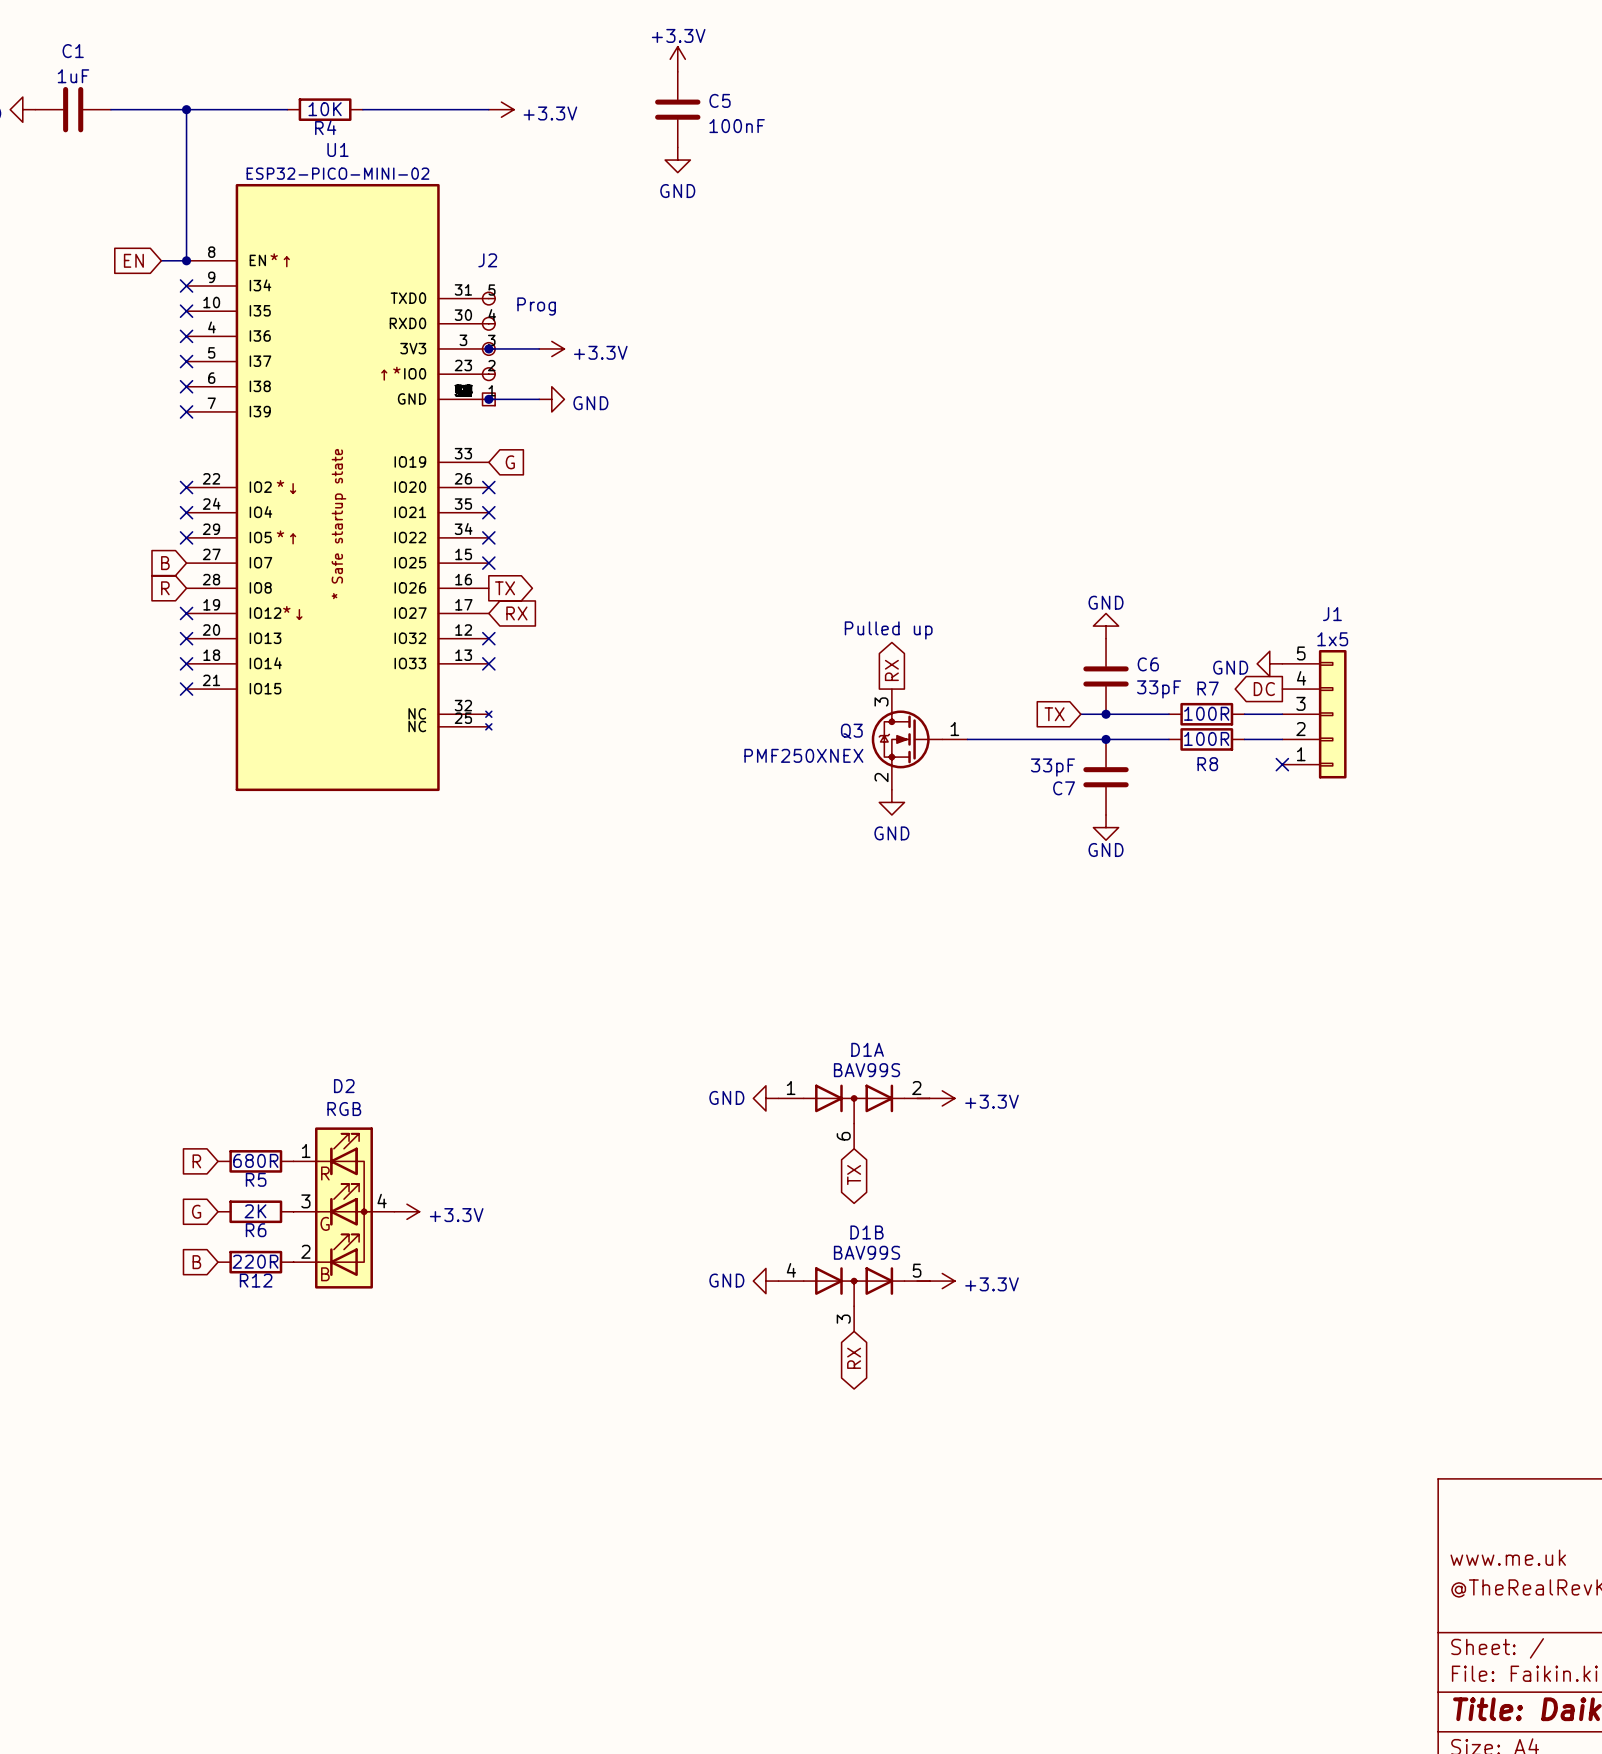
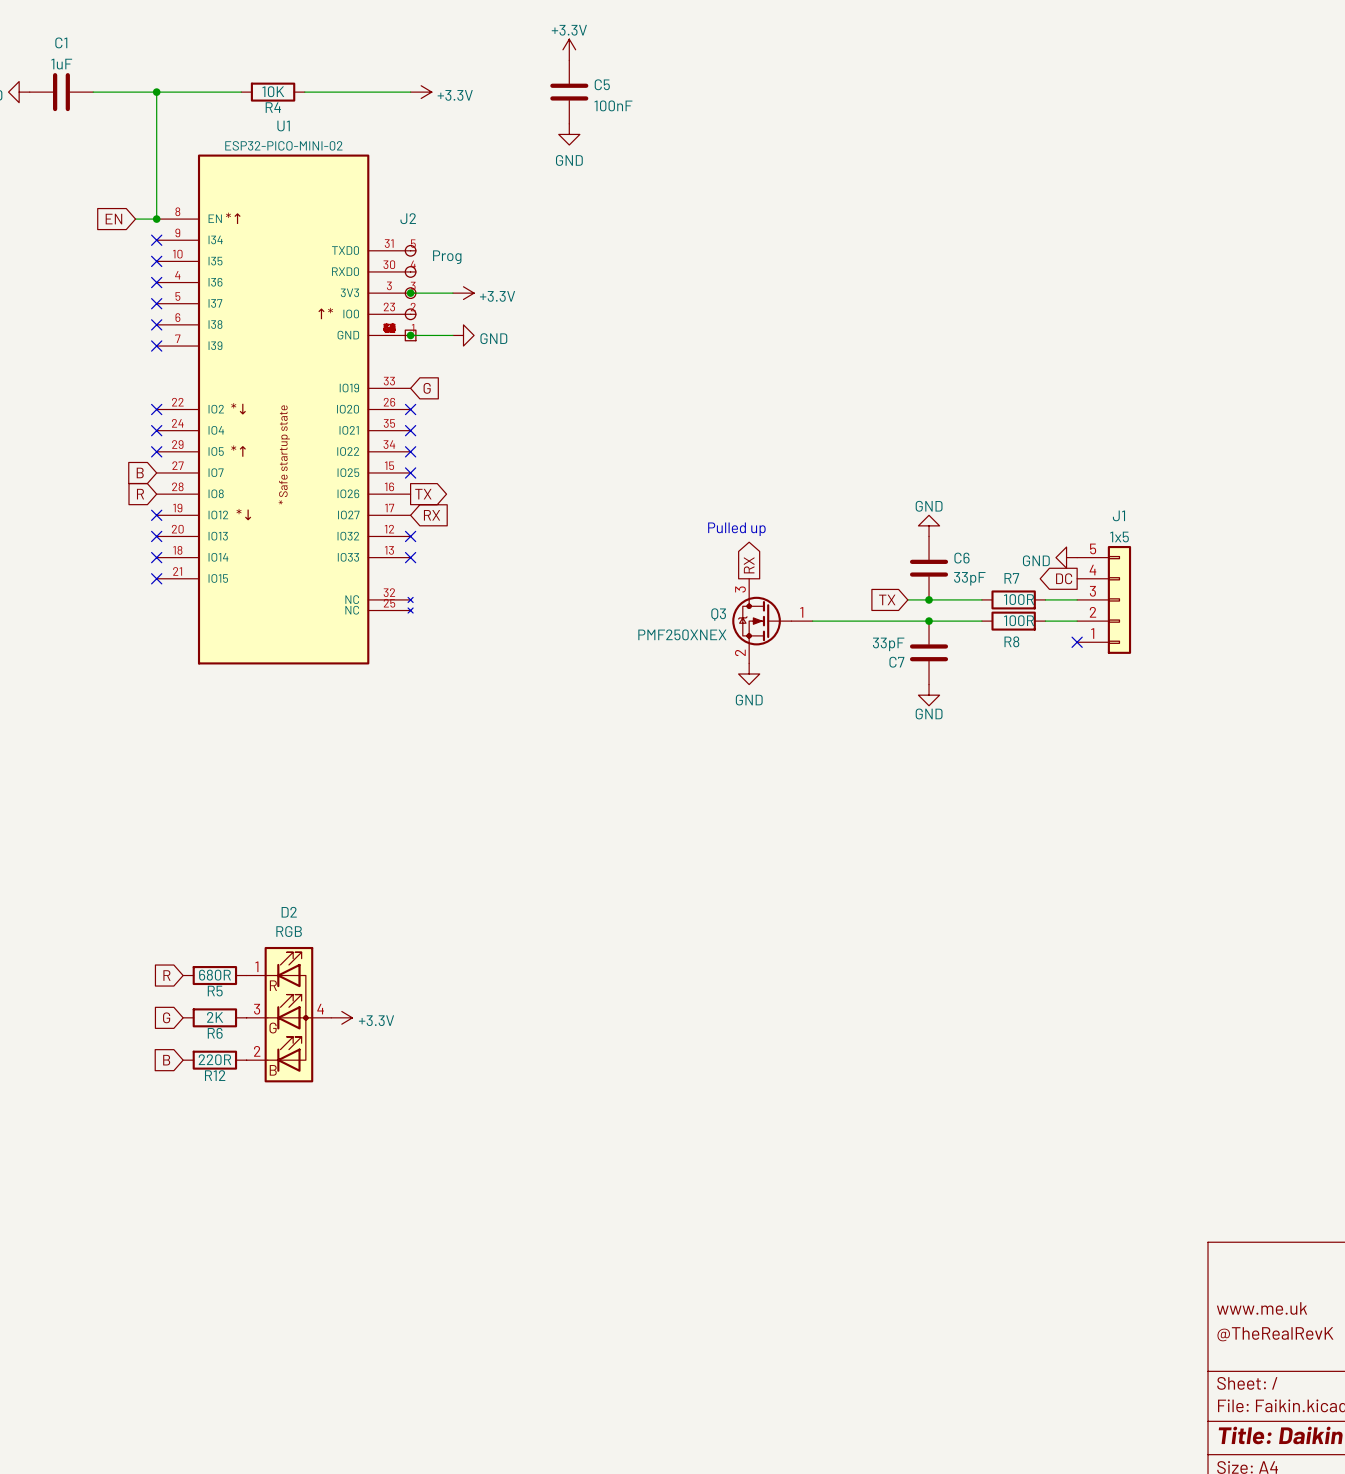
power symbol: GND (765, 1098) -> none
power symbol: +3.3V (942, 1098) -> none
D1A: BAV99S (854, 1116) -> none
global label: TX (854, 1175) -> none
power symbol: GND (765, 1281) -> none
power symbol: +3.3V (942, 1281) -> none
D1B: BAV99S (854, 1299) -> none
global label: RX (854, 1358) -> none

